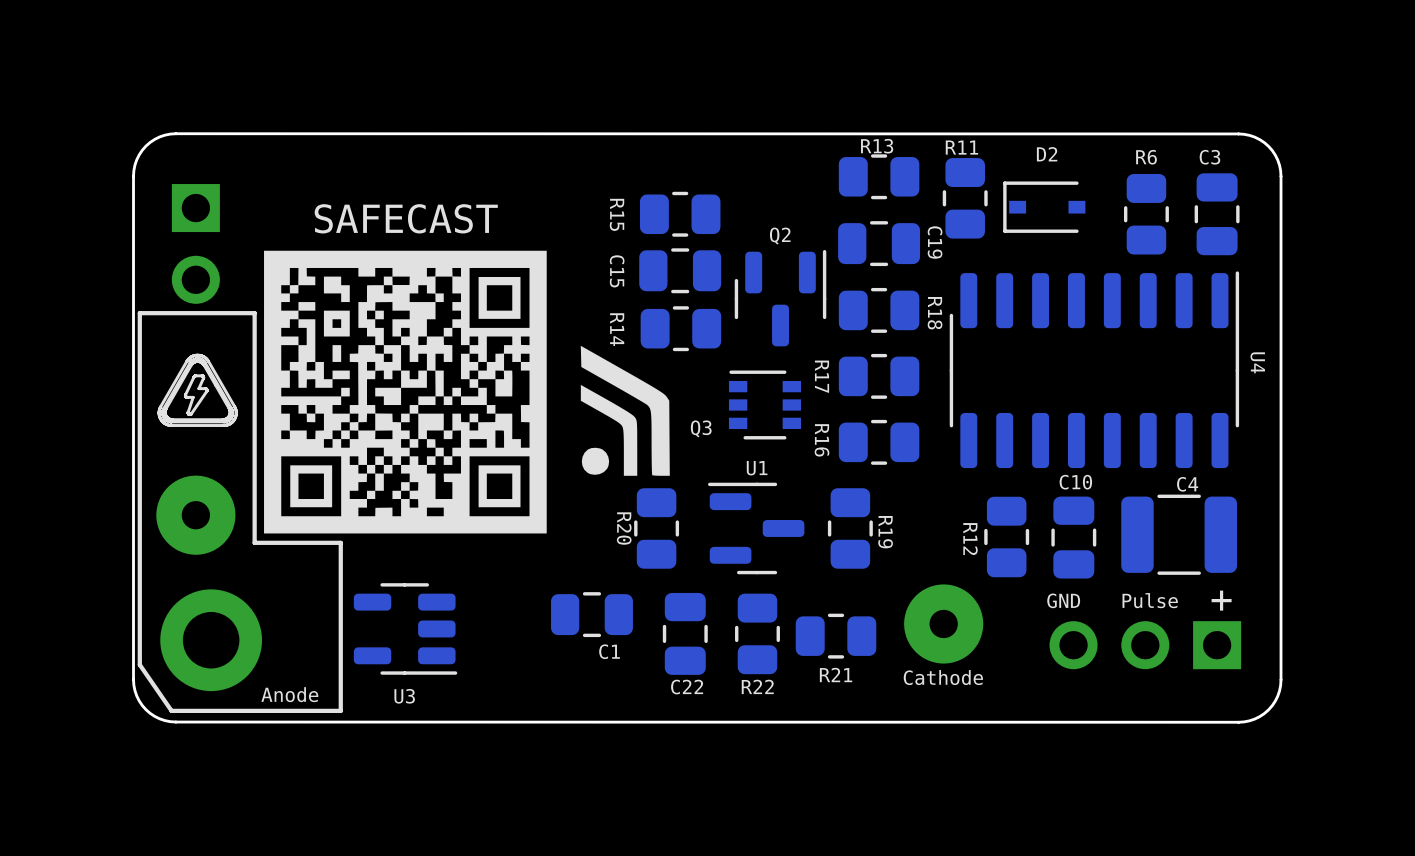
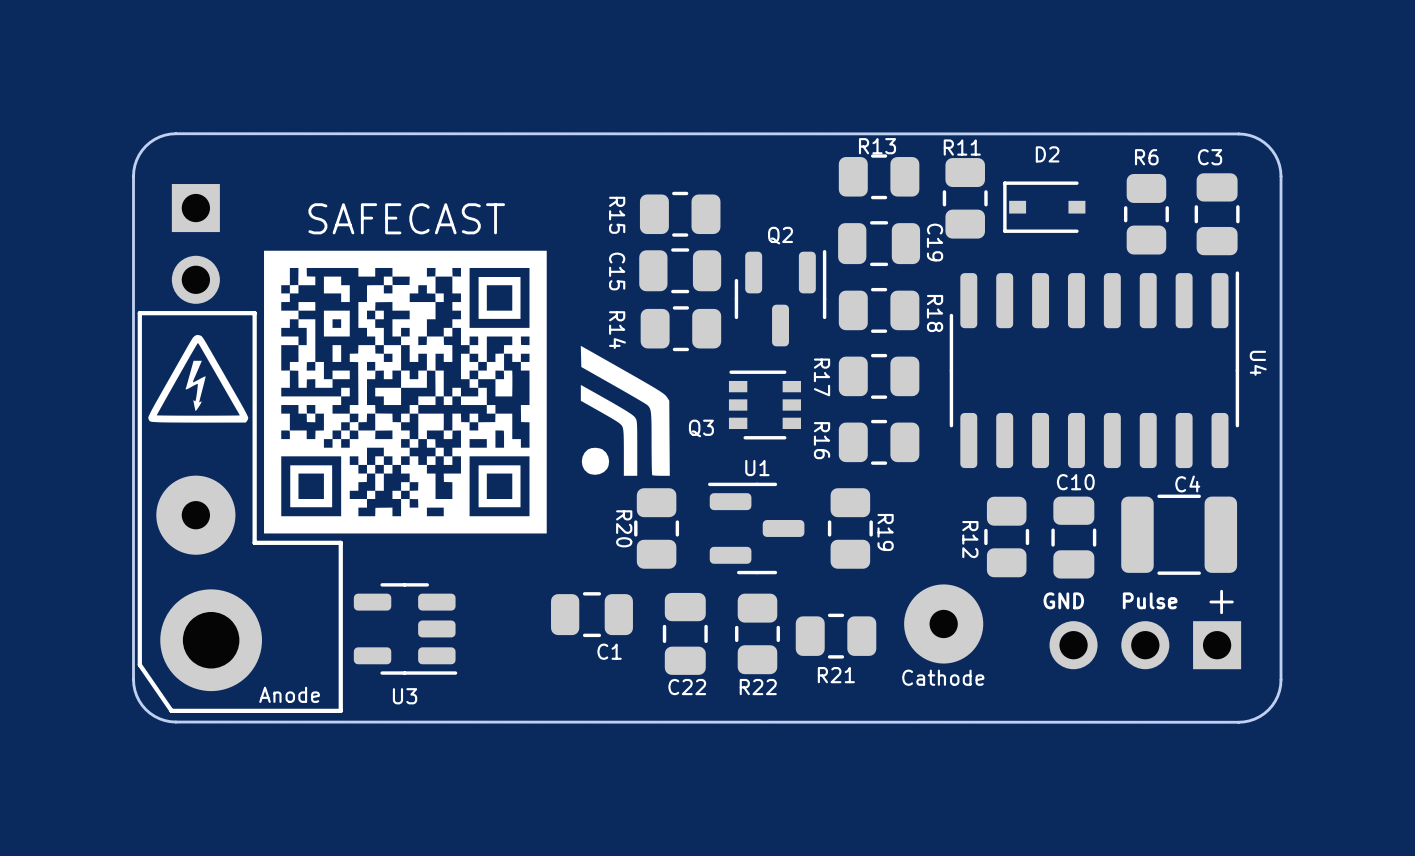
drawing: none -> [148, 334, 249, 423]
line: (197, 355) (207, 360) (234, 406) (236, 412) (234, 419) -> none
line: (197, 358) (189, 363) (163, 408) (163, 417) -> none
line: (186, 361) (159, 408) (160, 419) (169, 425) (223, 425) -> none
line: (205, 363) (231, 408) (231, 417) (224, 421) (171, 421) -> none
line: (191, 365) (166, 408) -> none
line: (204, 365) (229, 408) -> none
line: (201, 375) (195, 375) -> none
line: (194, 376) (185, 394) -> none
line: (203, 378) (198, 388) (205, 388) -> none
line: (206, 391) (191, 413) -> none
line: (187, 397) (193, 397) (188, 412) -> none
line: (222, 419) (172, 419) -> none

